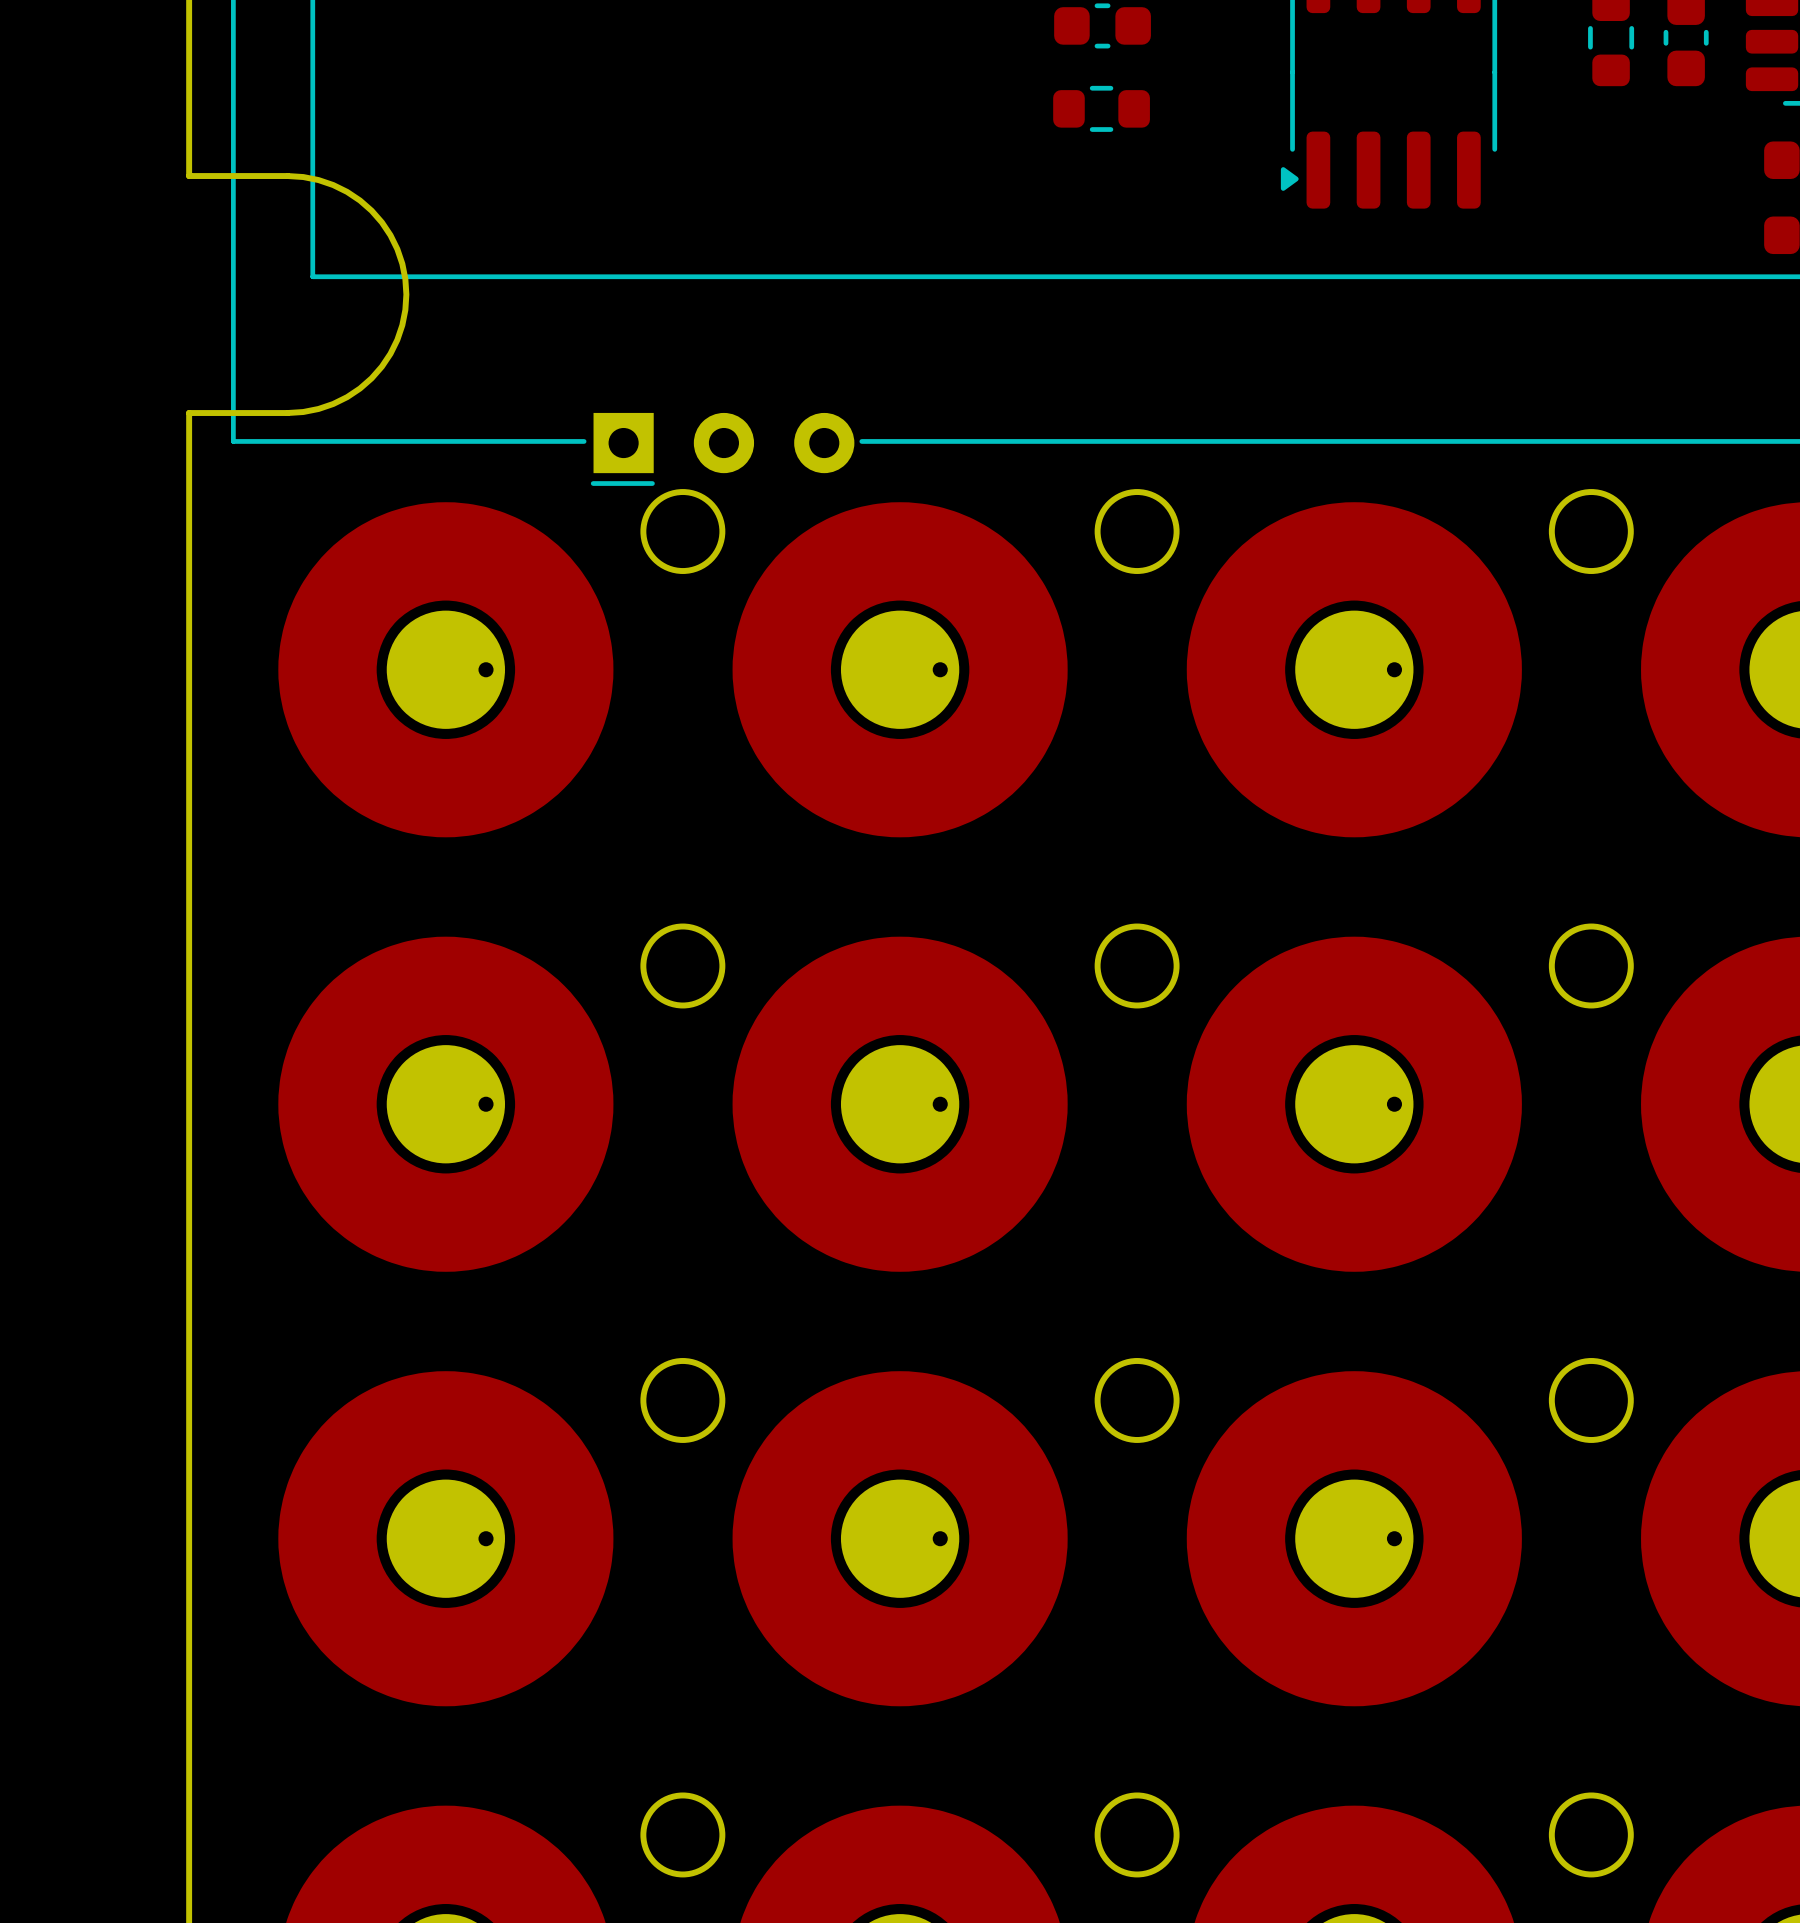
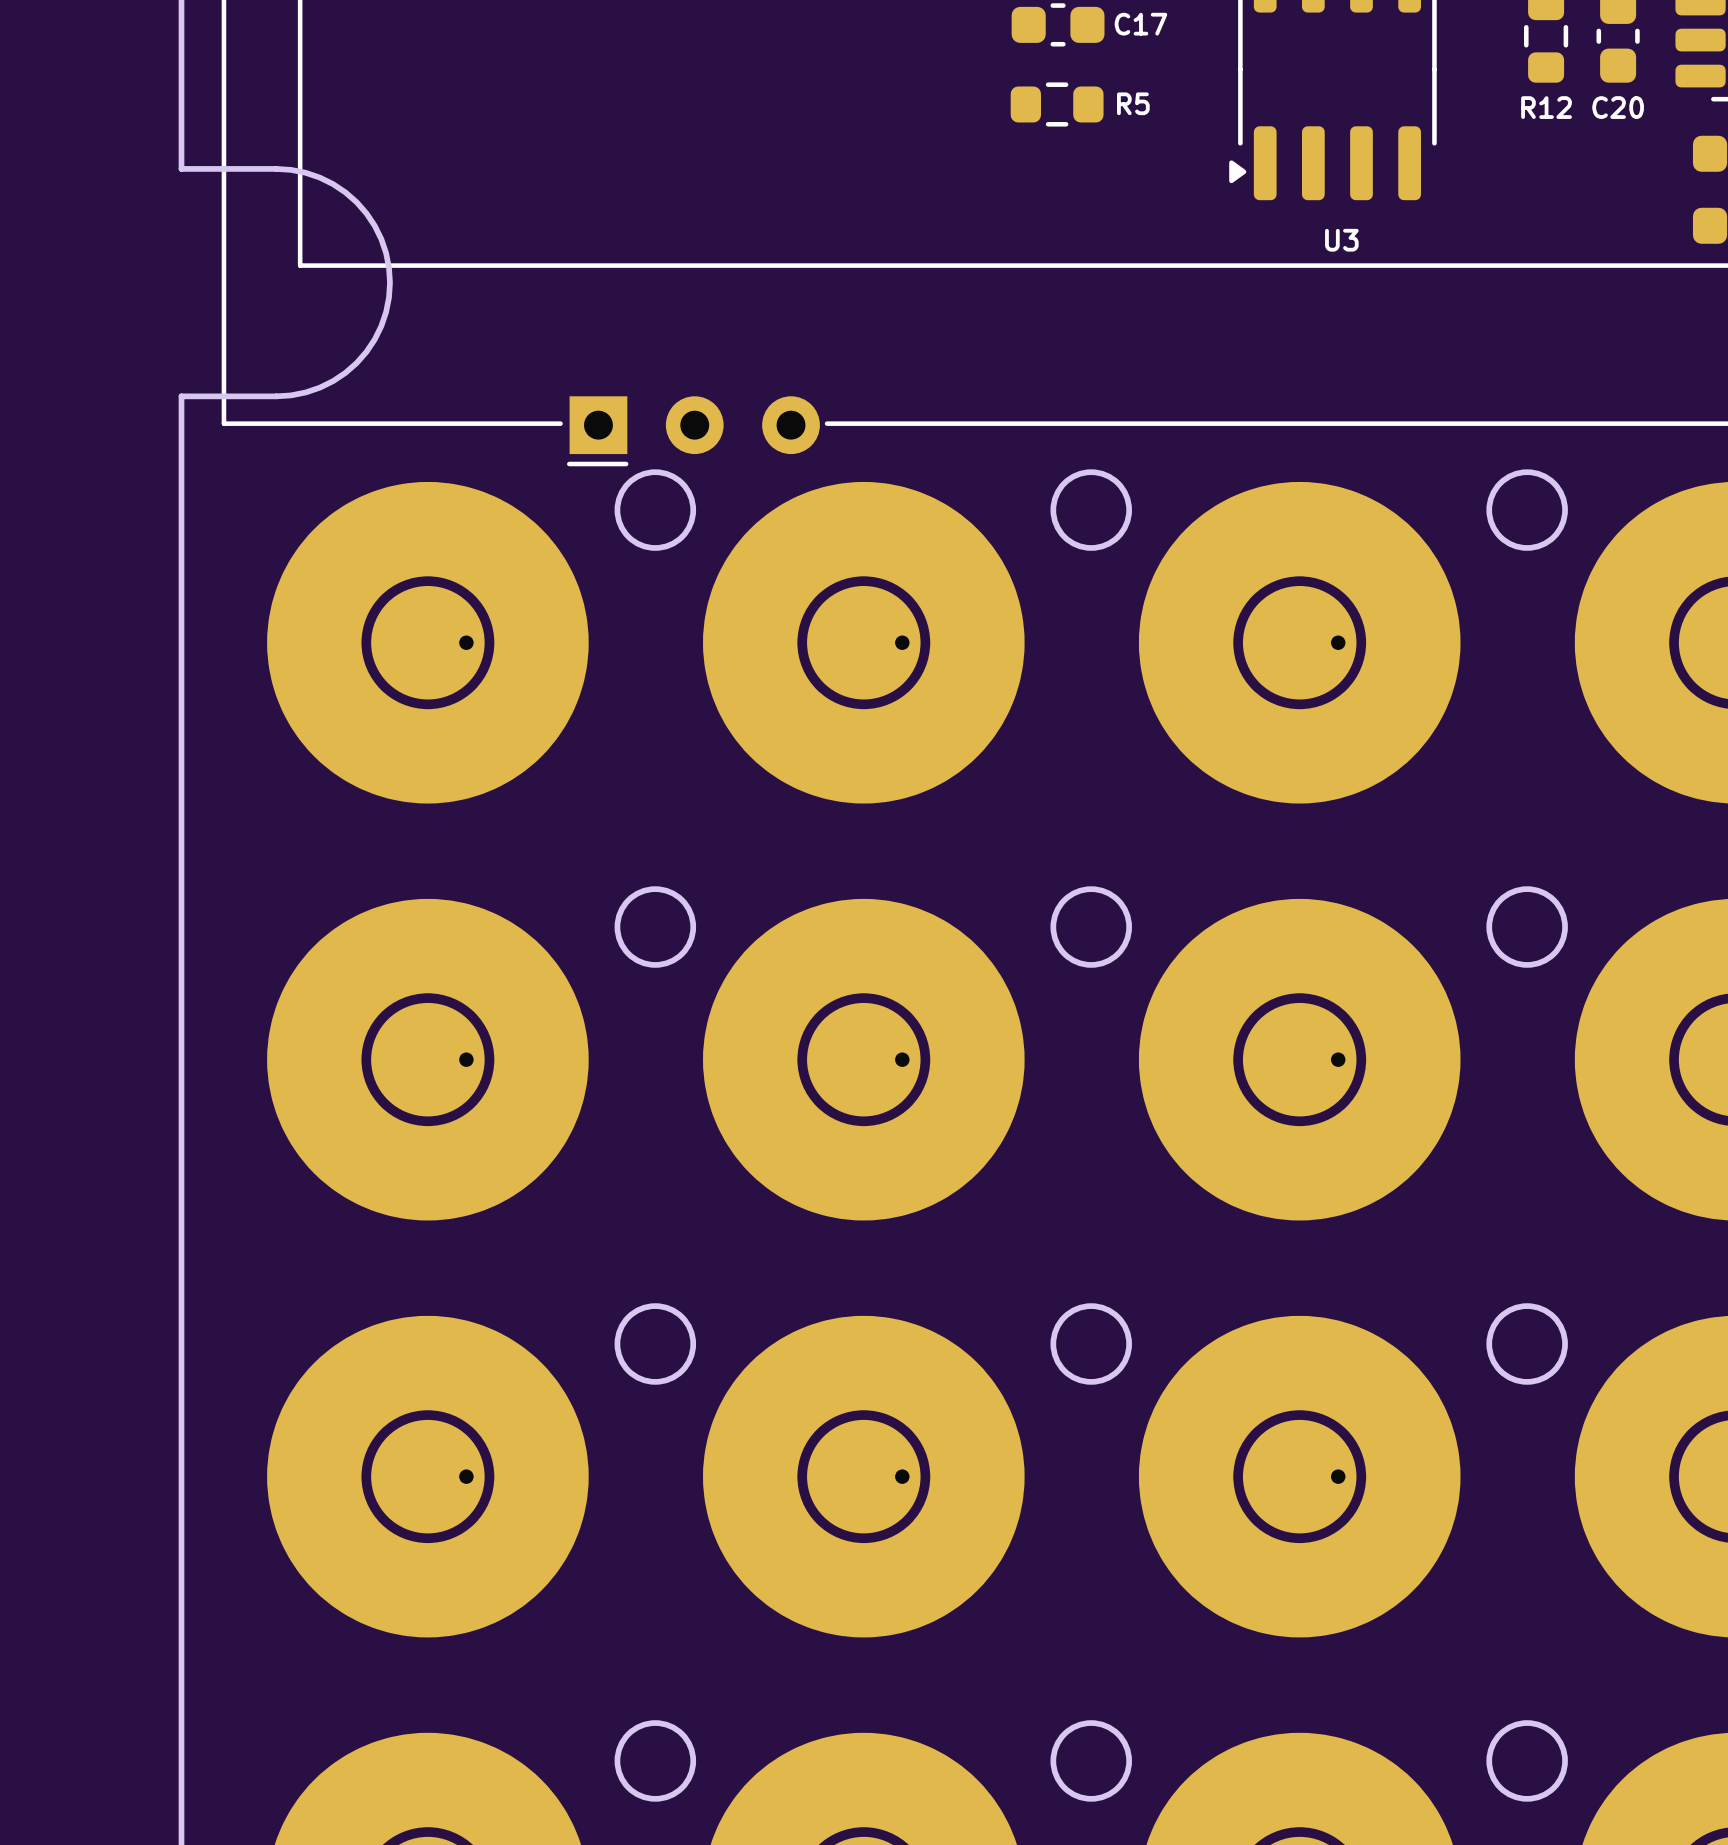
C17 name: none -> C17 (1140, 24)
R5 name: none -> R5 (1133, 103)
R12 name: none -> R12 (1546, 107)
C20 name: none -> C20 (1618, 107)
U3 name: none -> U3 (1341, 240)

